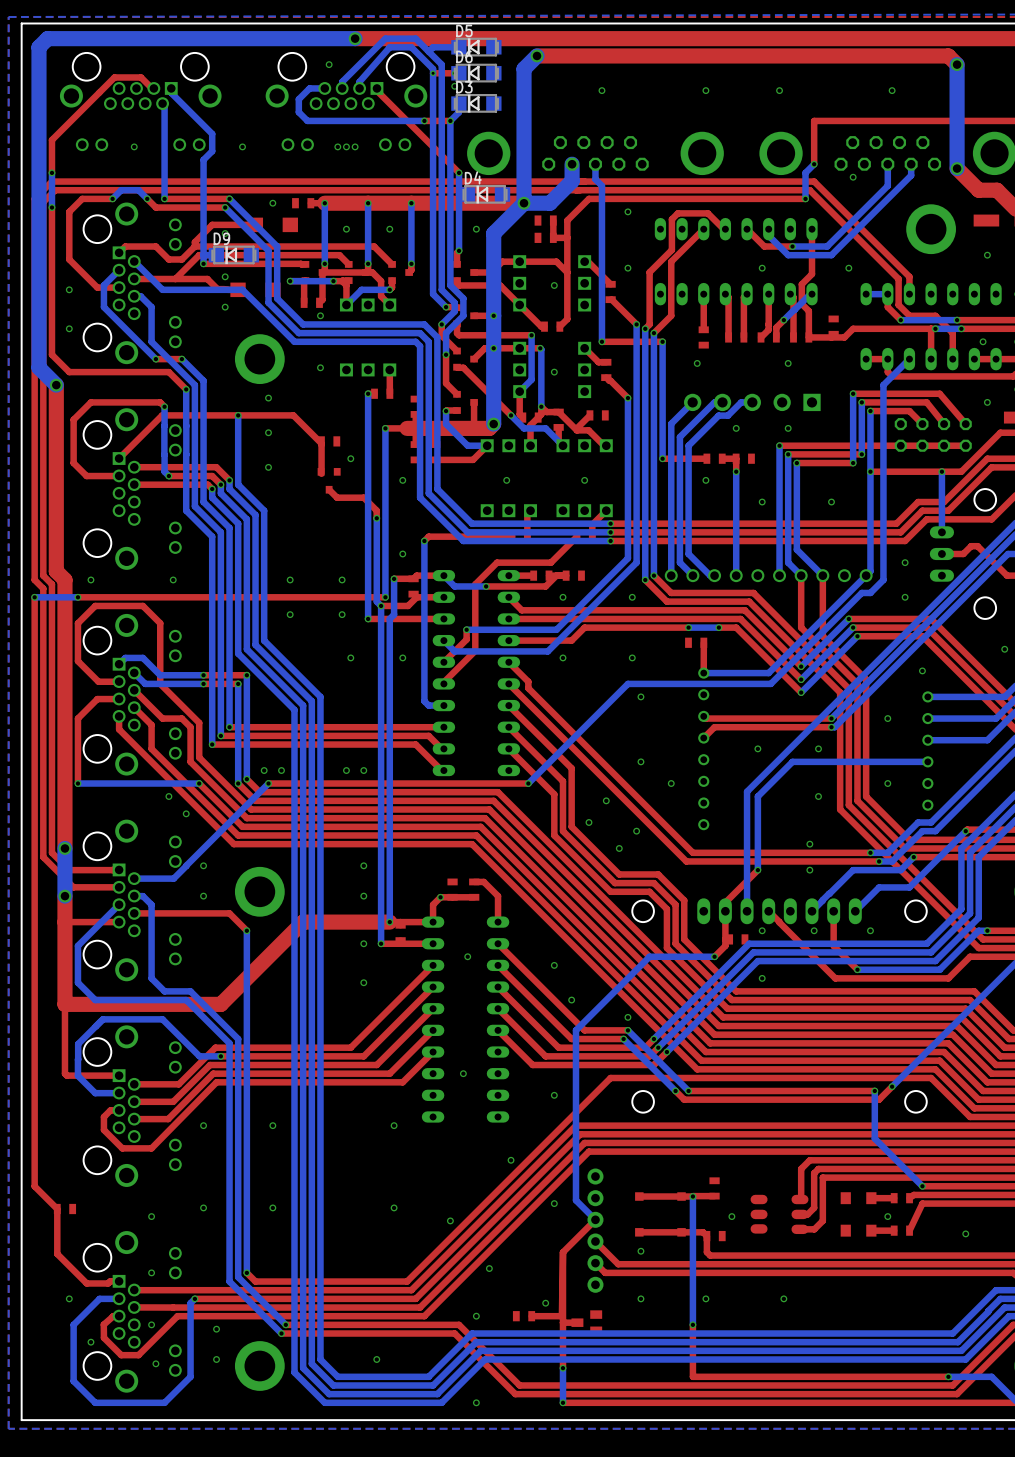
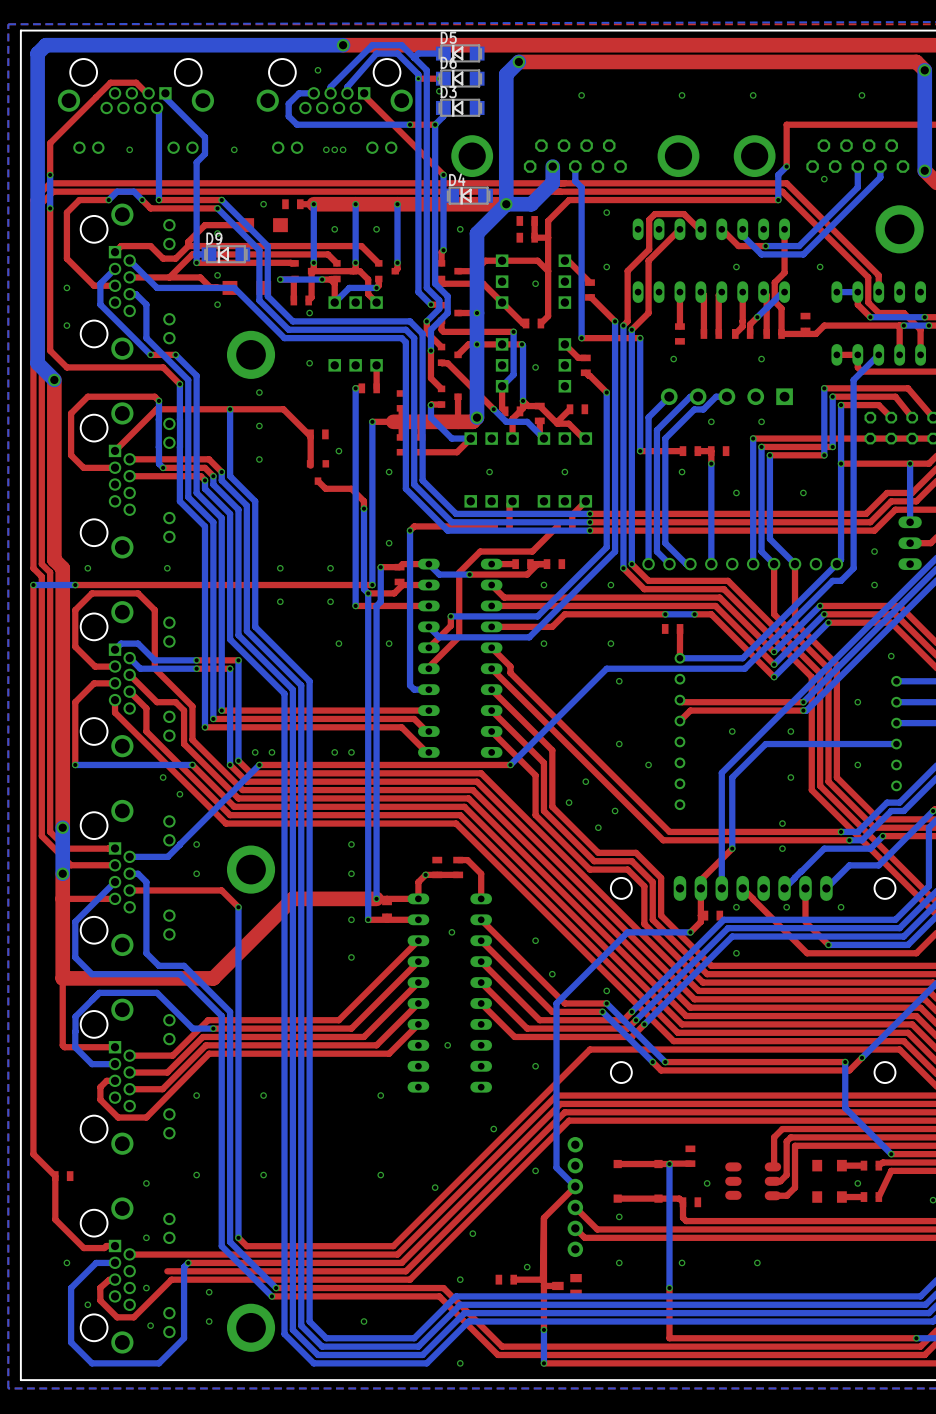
top track: (134, 1307) (173, 1307) -> none

